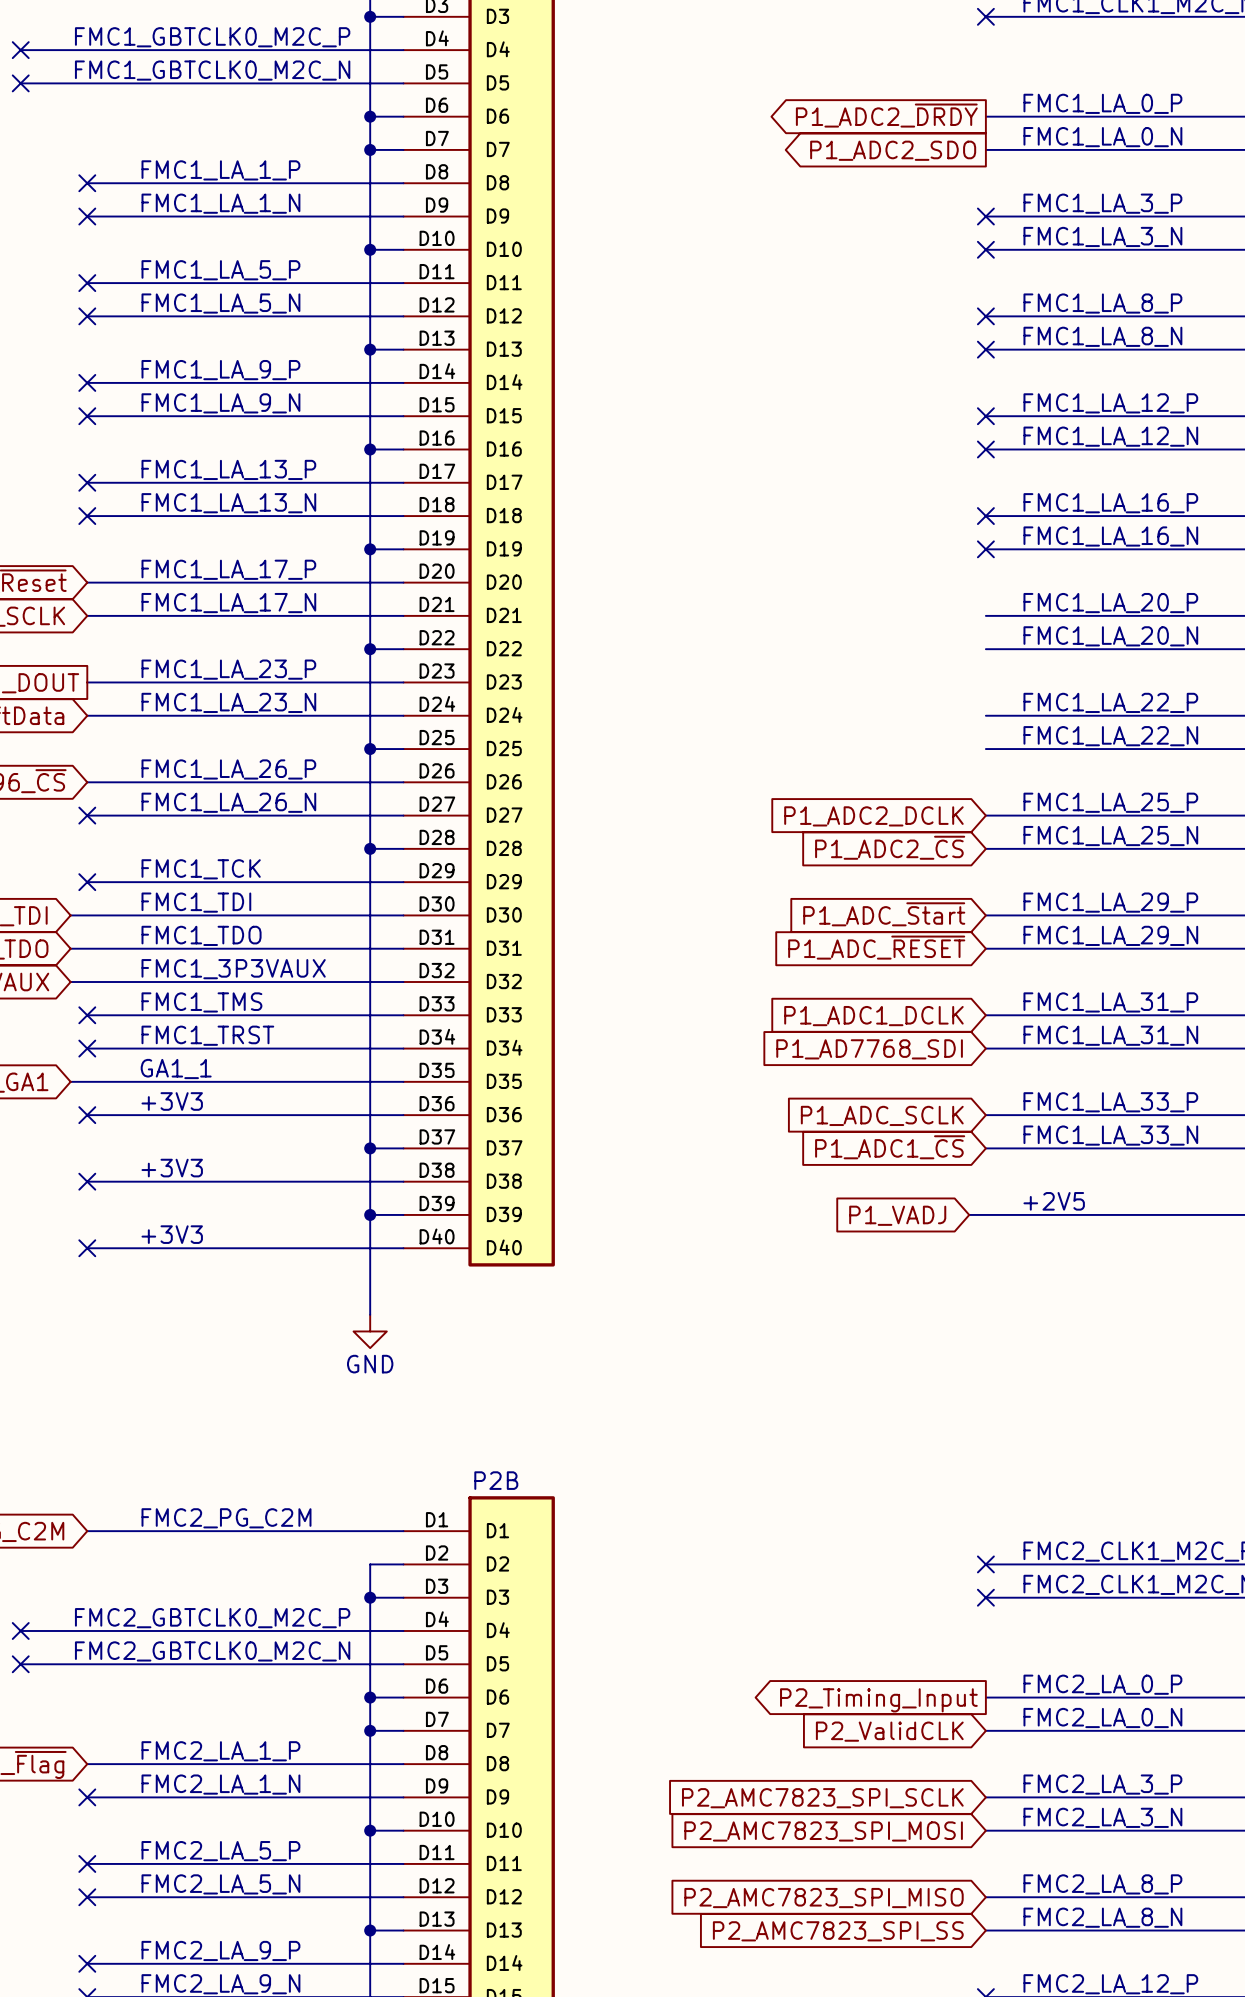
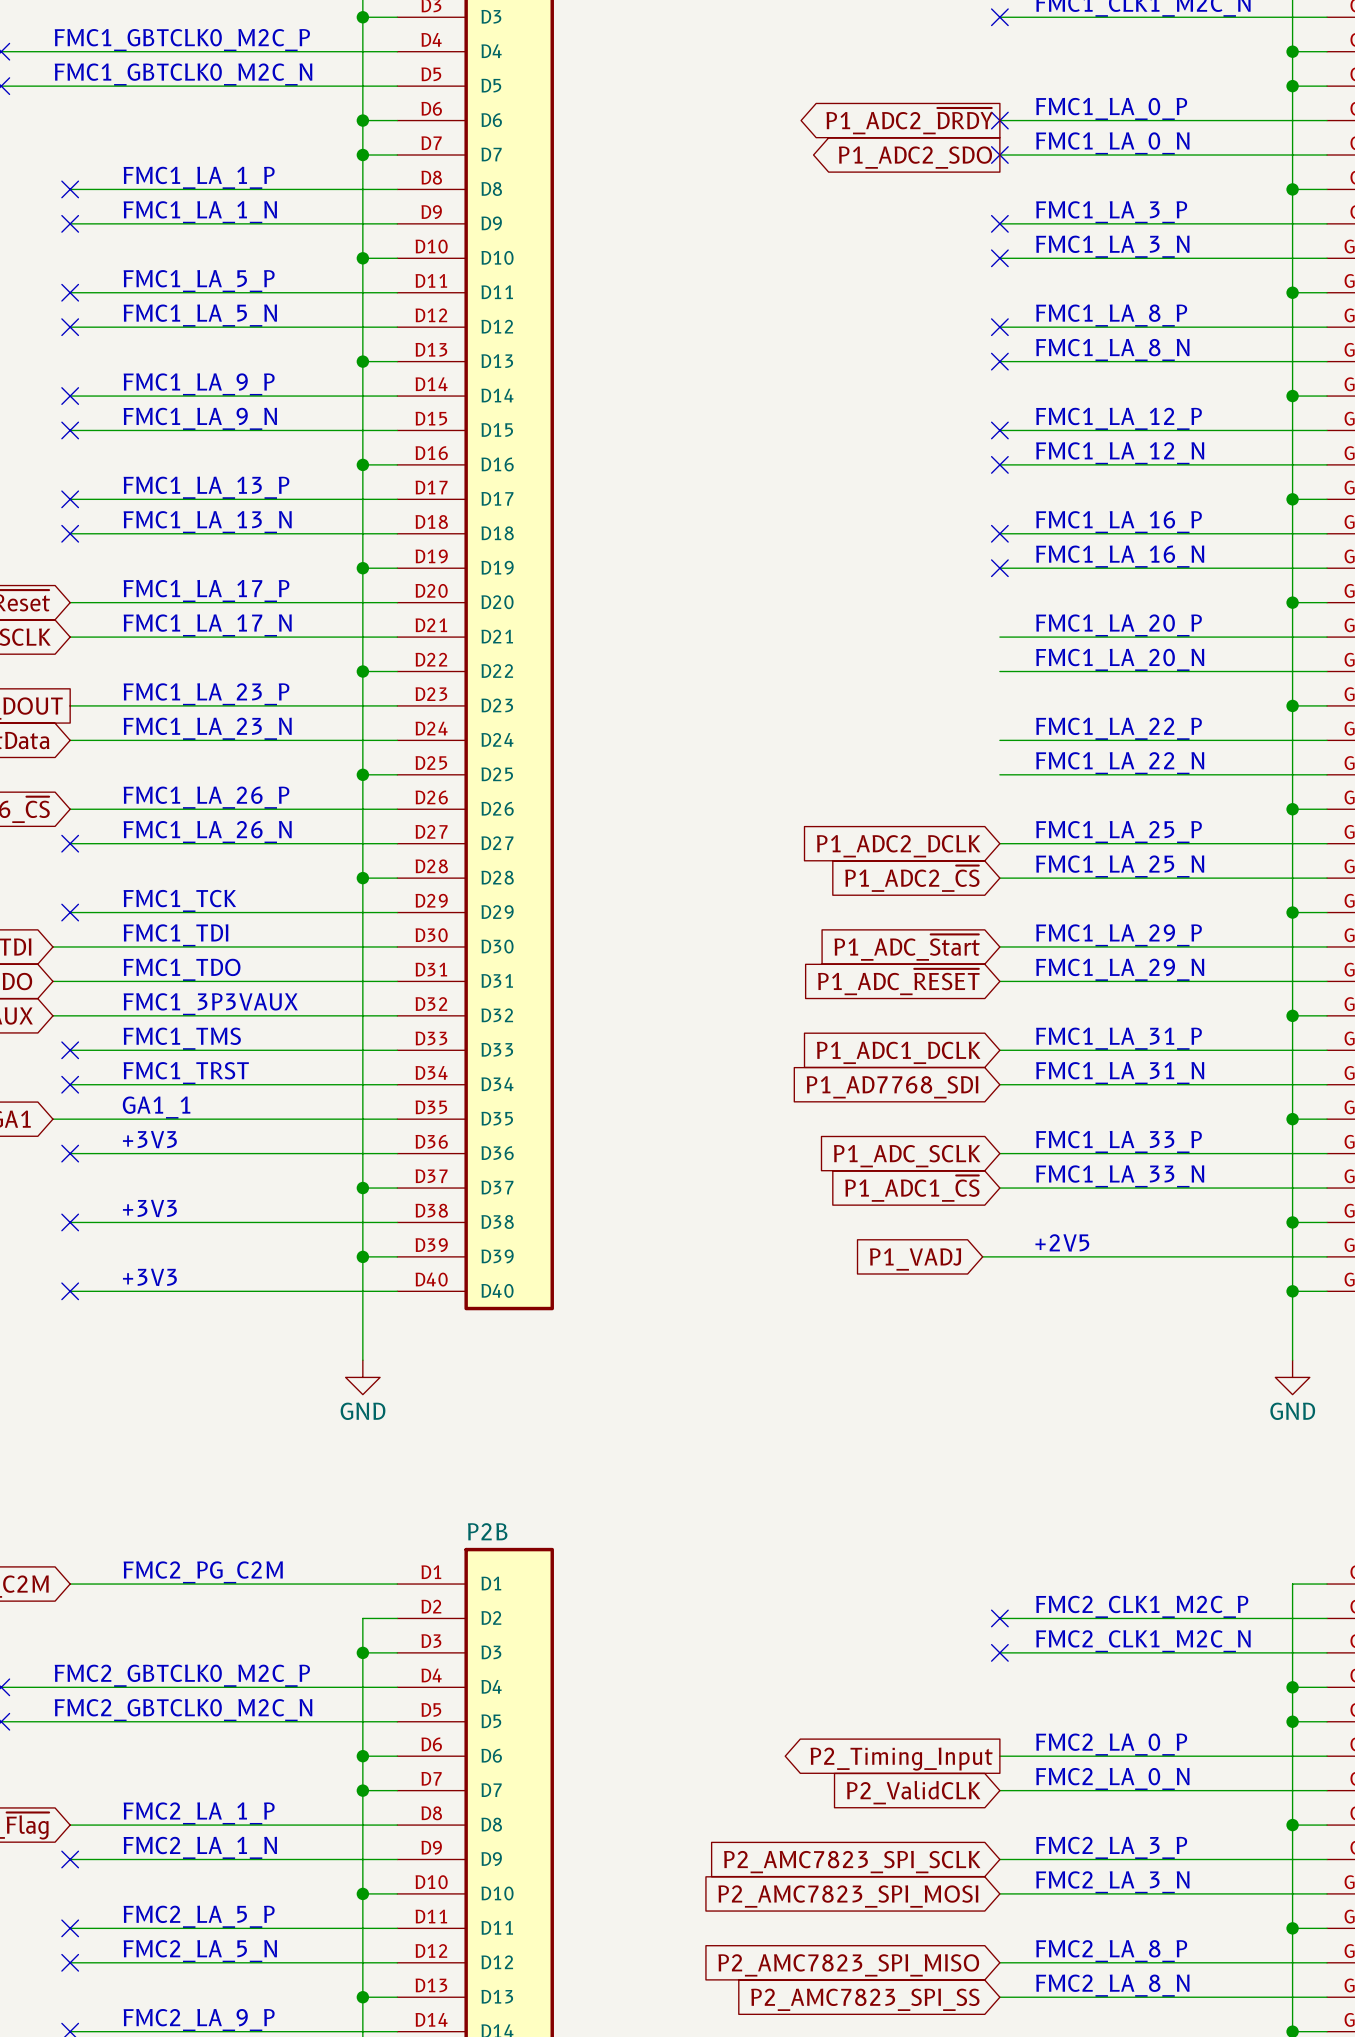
no-connect mark: none -> (999, 120)
no-connect mark: none -> (999, 155)

